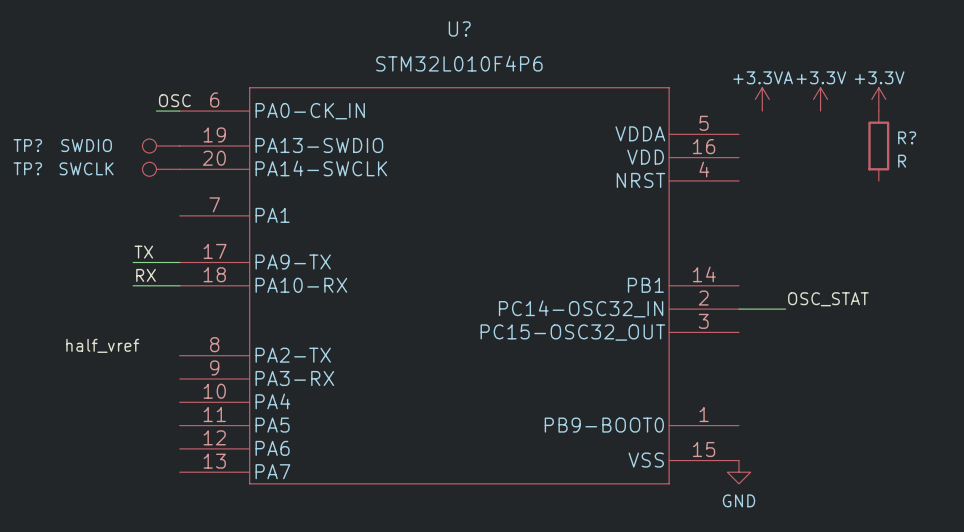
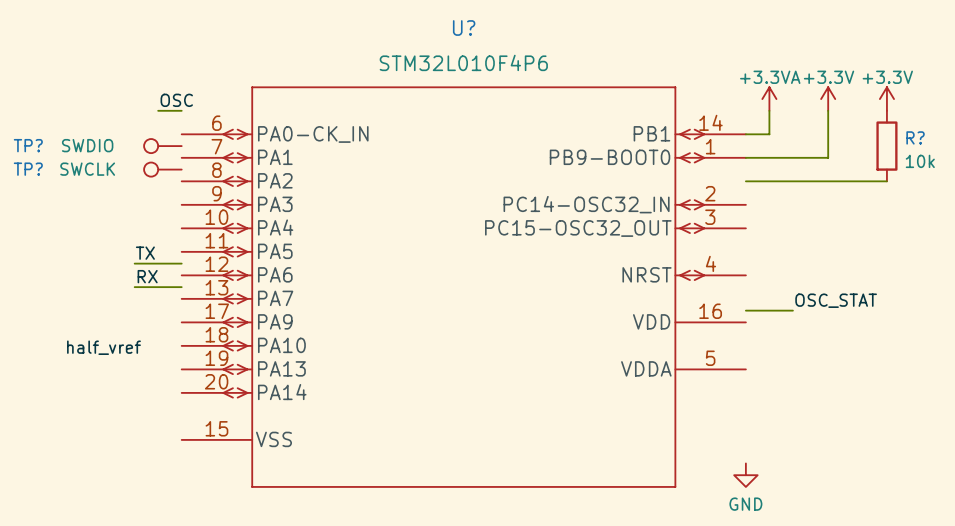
U? symbol: [179, 87, 740, 485] -> [181, 86, 746, 488]
wire: none -> (769, 110) (769, 134) (745, 134)
wire: none -> (828, 110) (828, 157) (745, 157)
R? value: R (902, 161) -> 10k (920, 161)
wire: none -> (745, 181) (886, 181)

